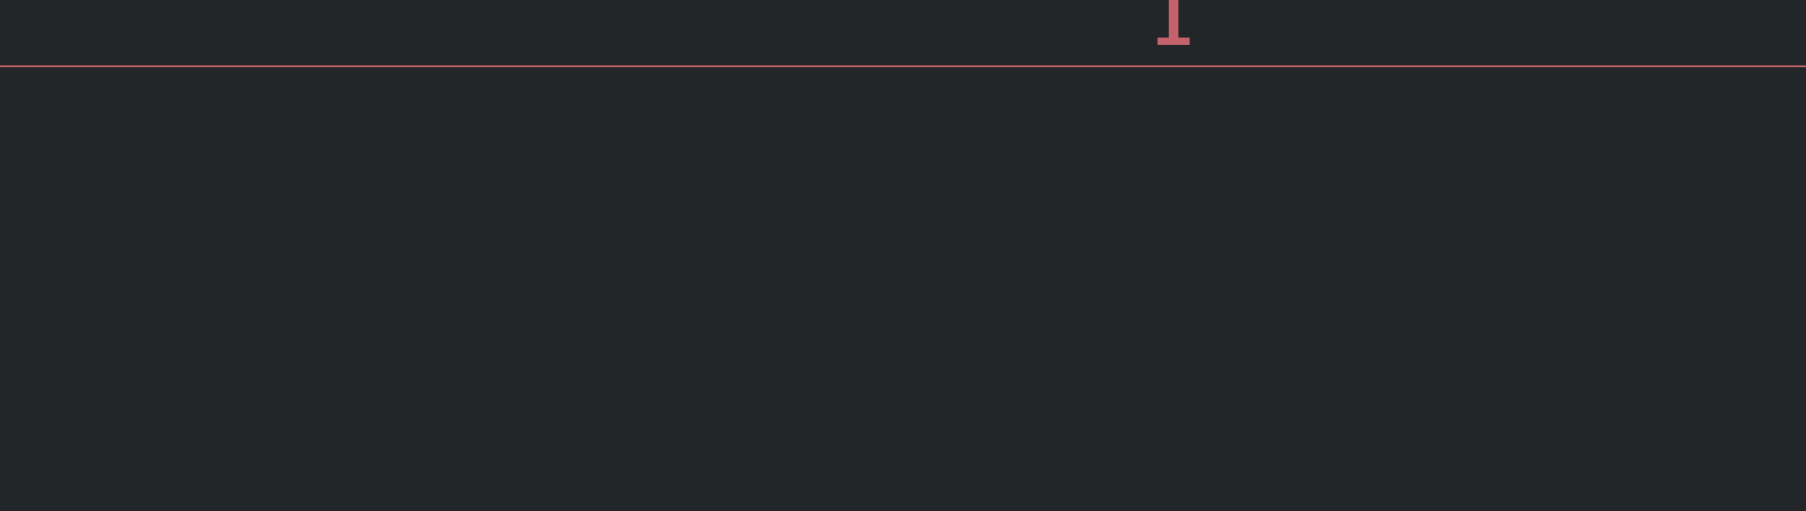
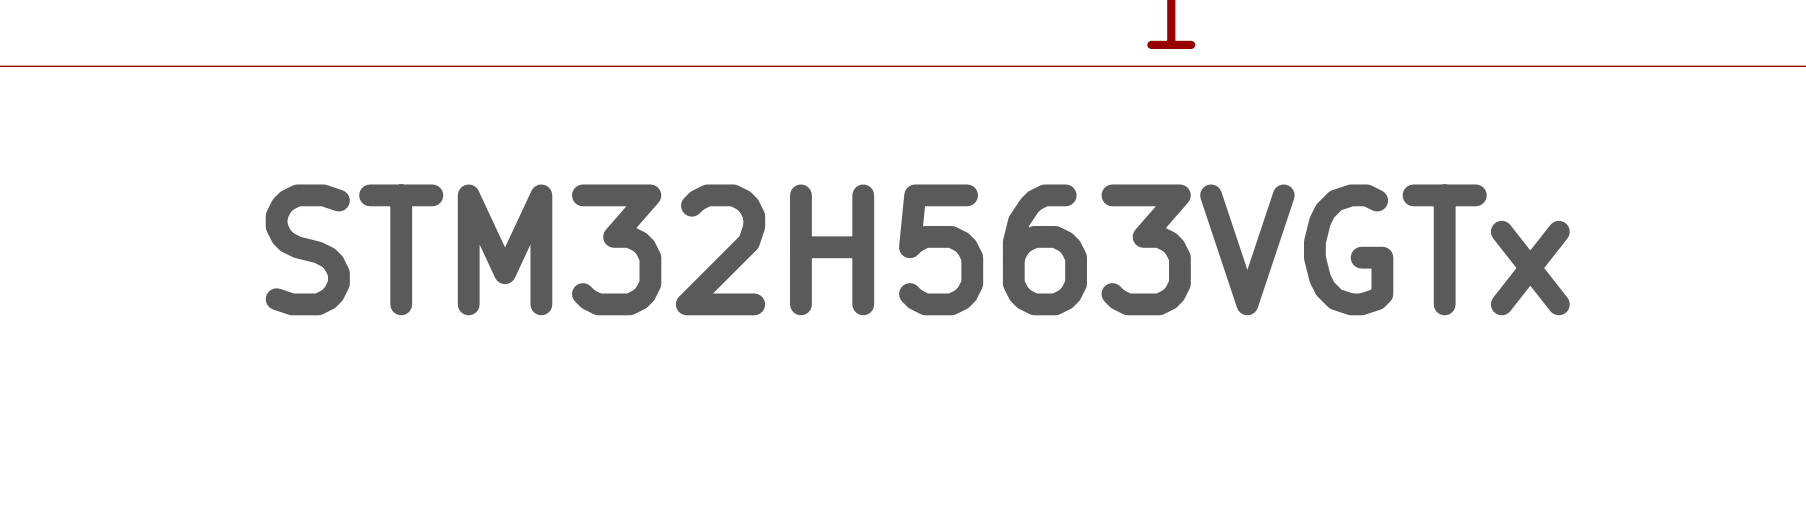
text: none -> STM32H563VGTx (917, 249)

